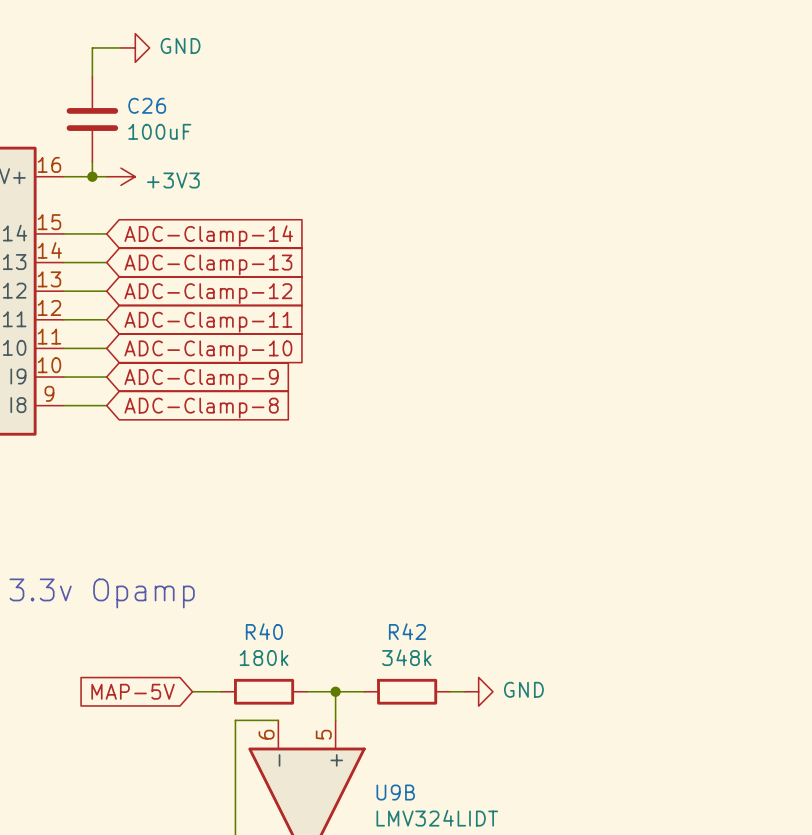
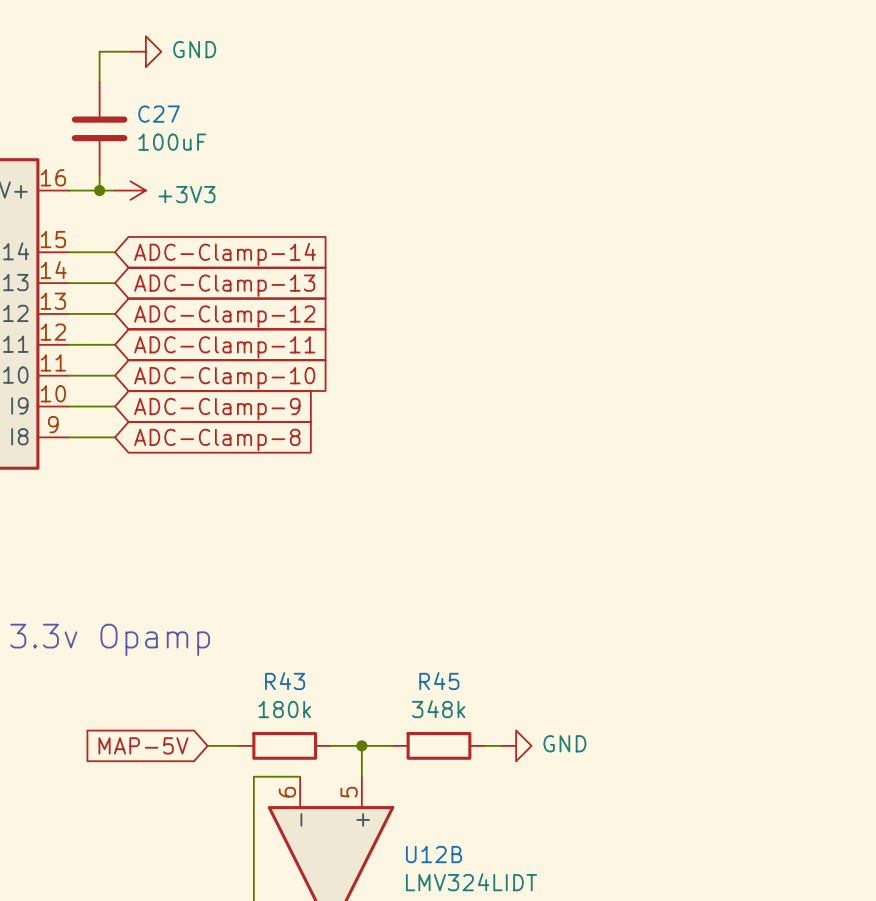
C26 name: C26 (147, 105) -> C27 (159, 114)
R40 name: R40 (264, 631) -> R43 (285, 681)
R42 name: R42 (407, 631) -> R45 (439, 681)
U9B name: U9B (395, 792) -> U12B (434, 854)

